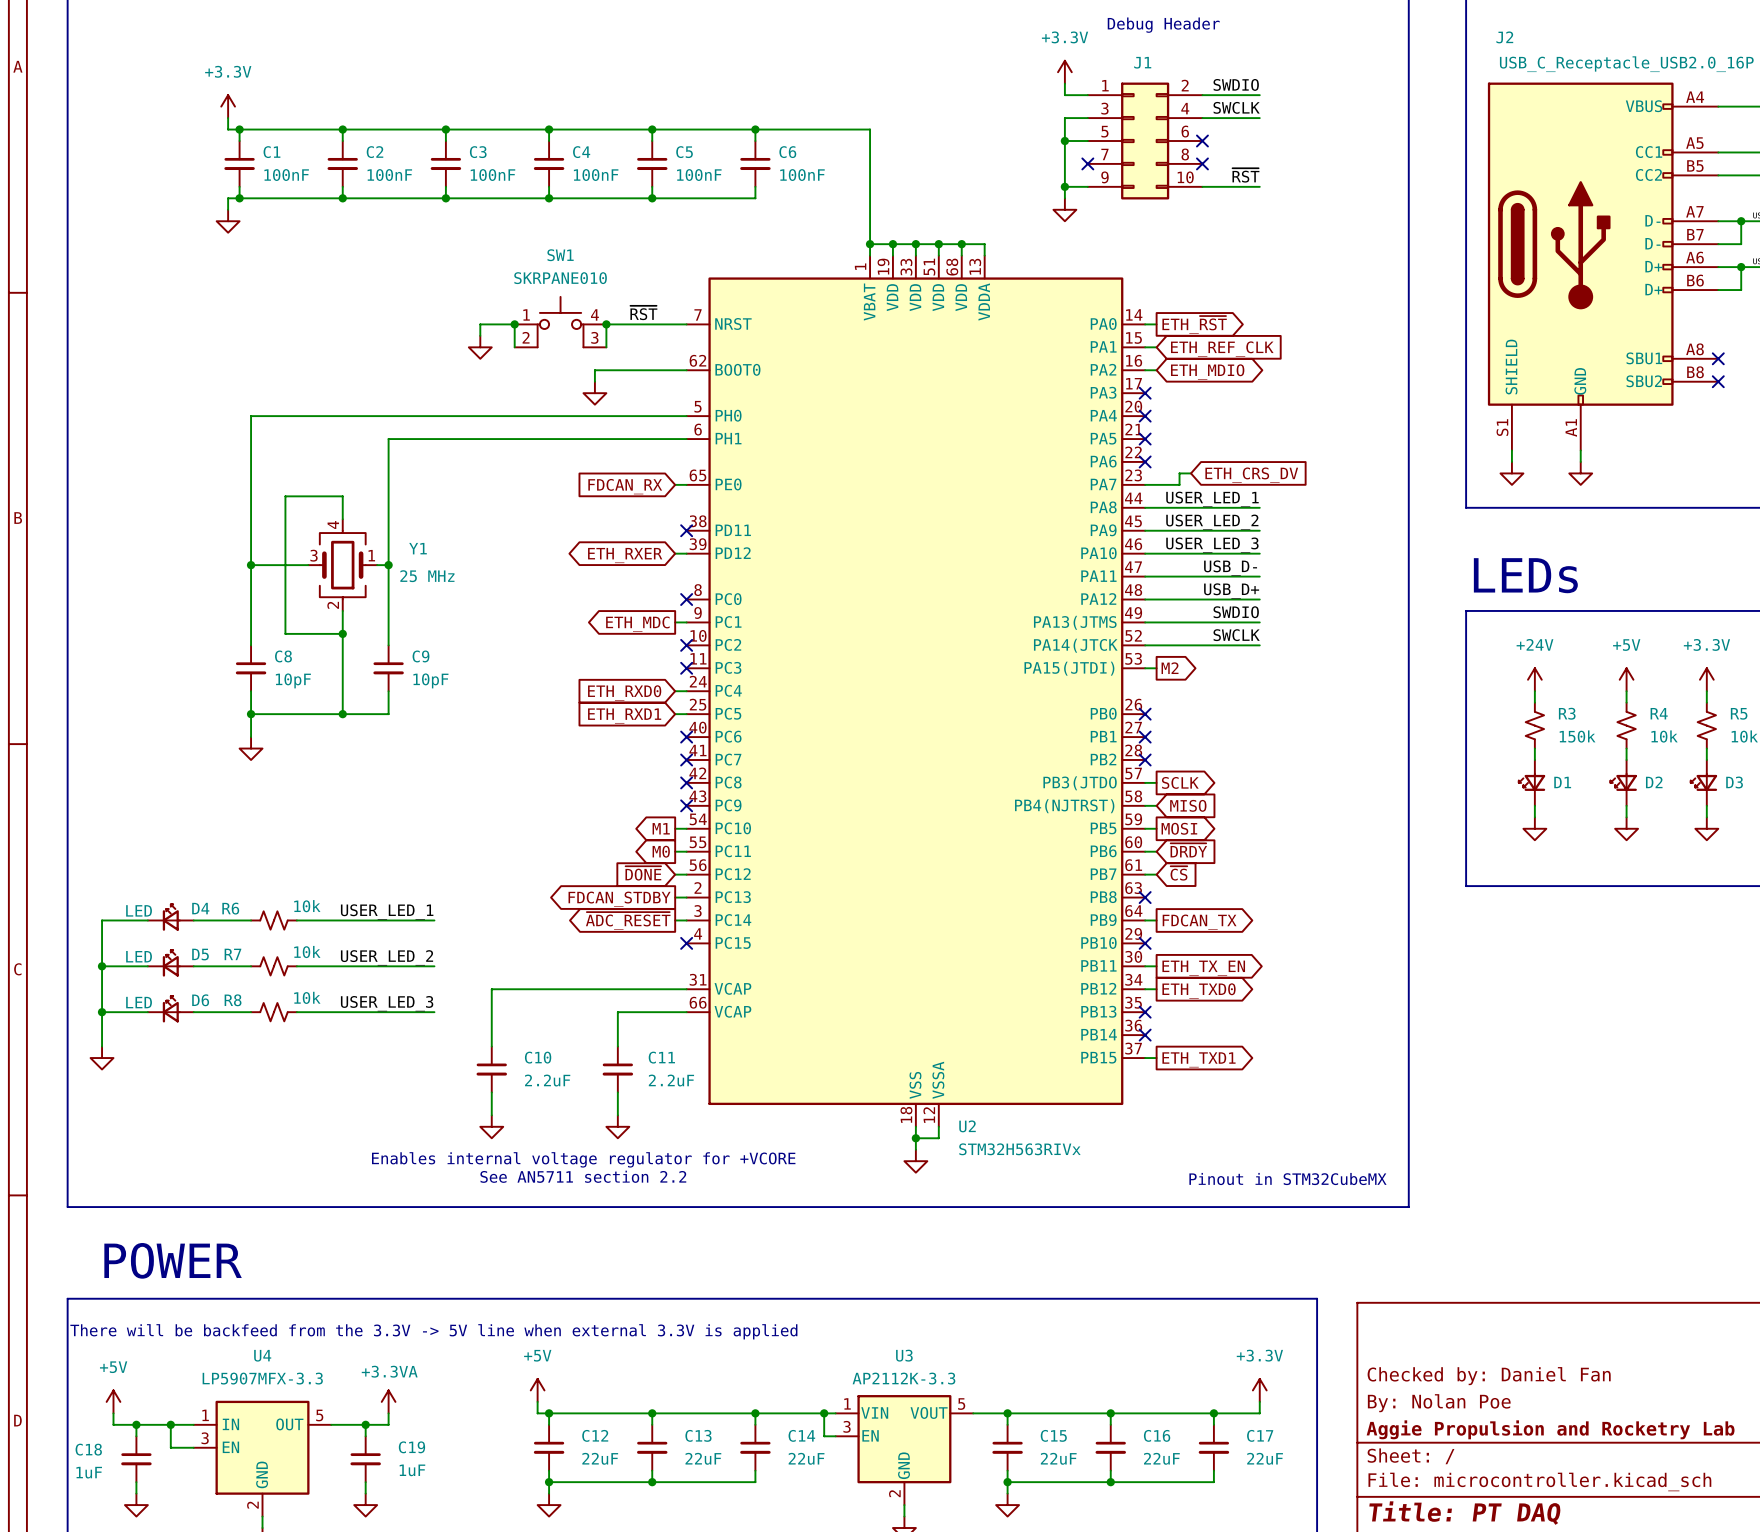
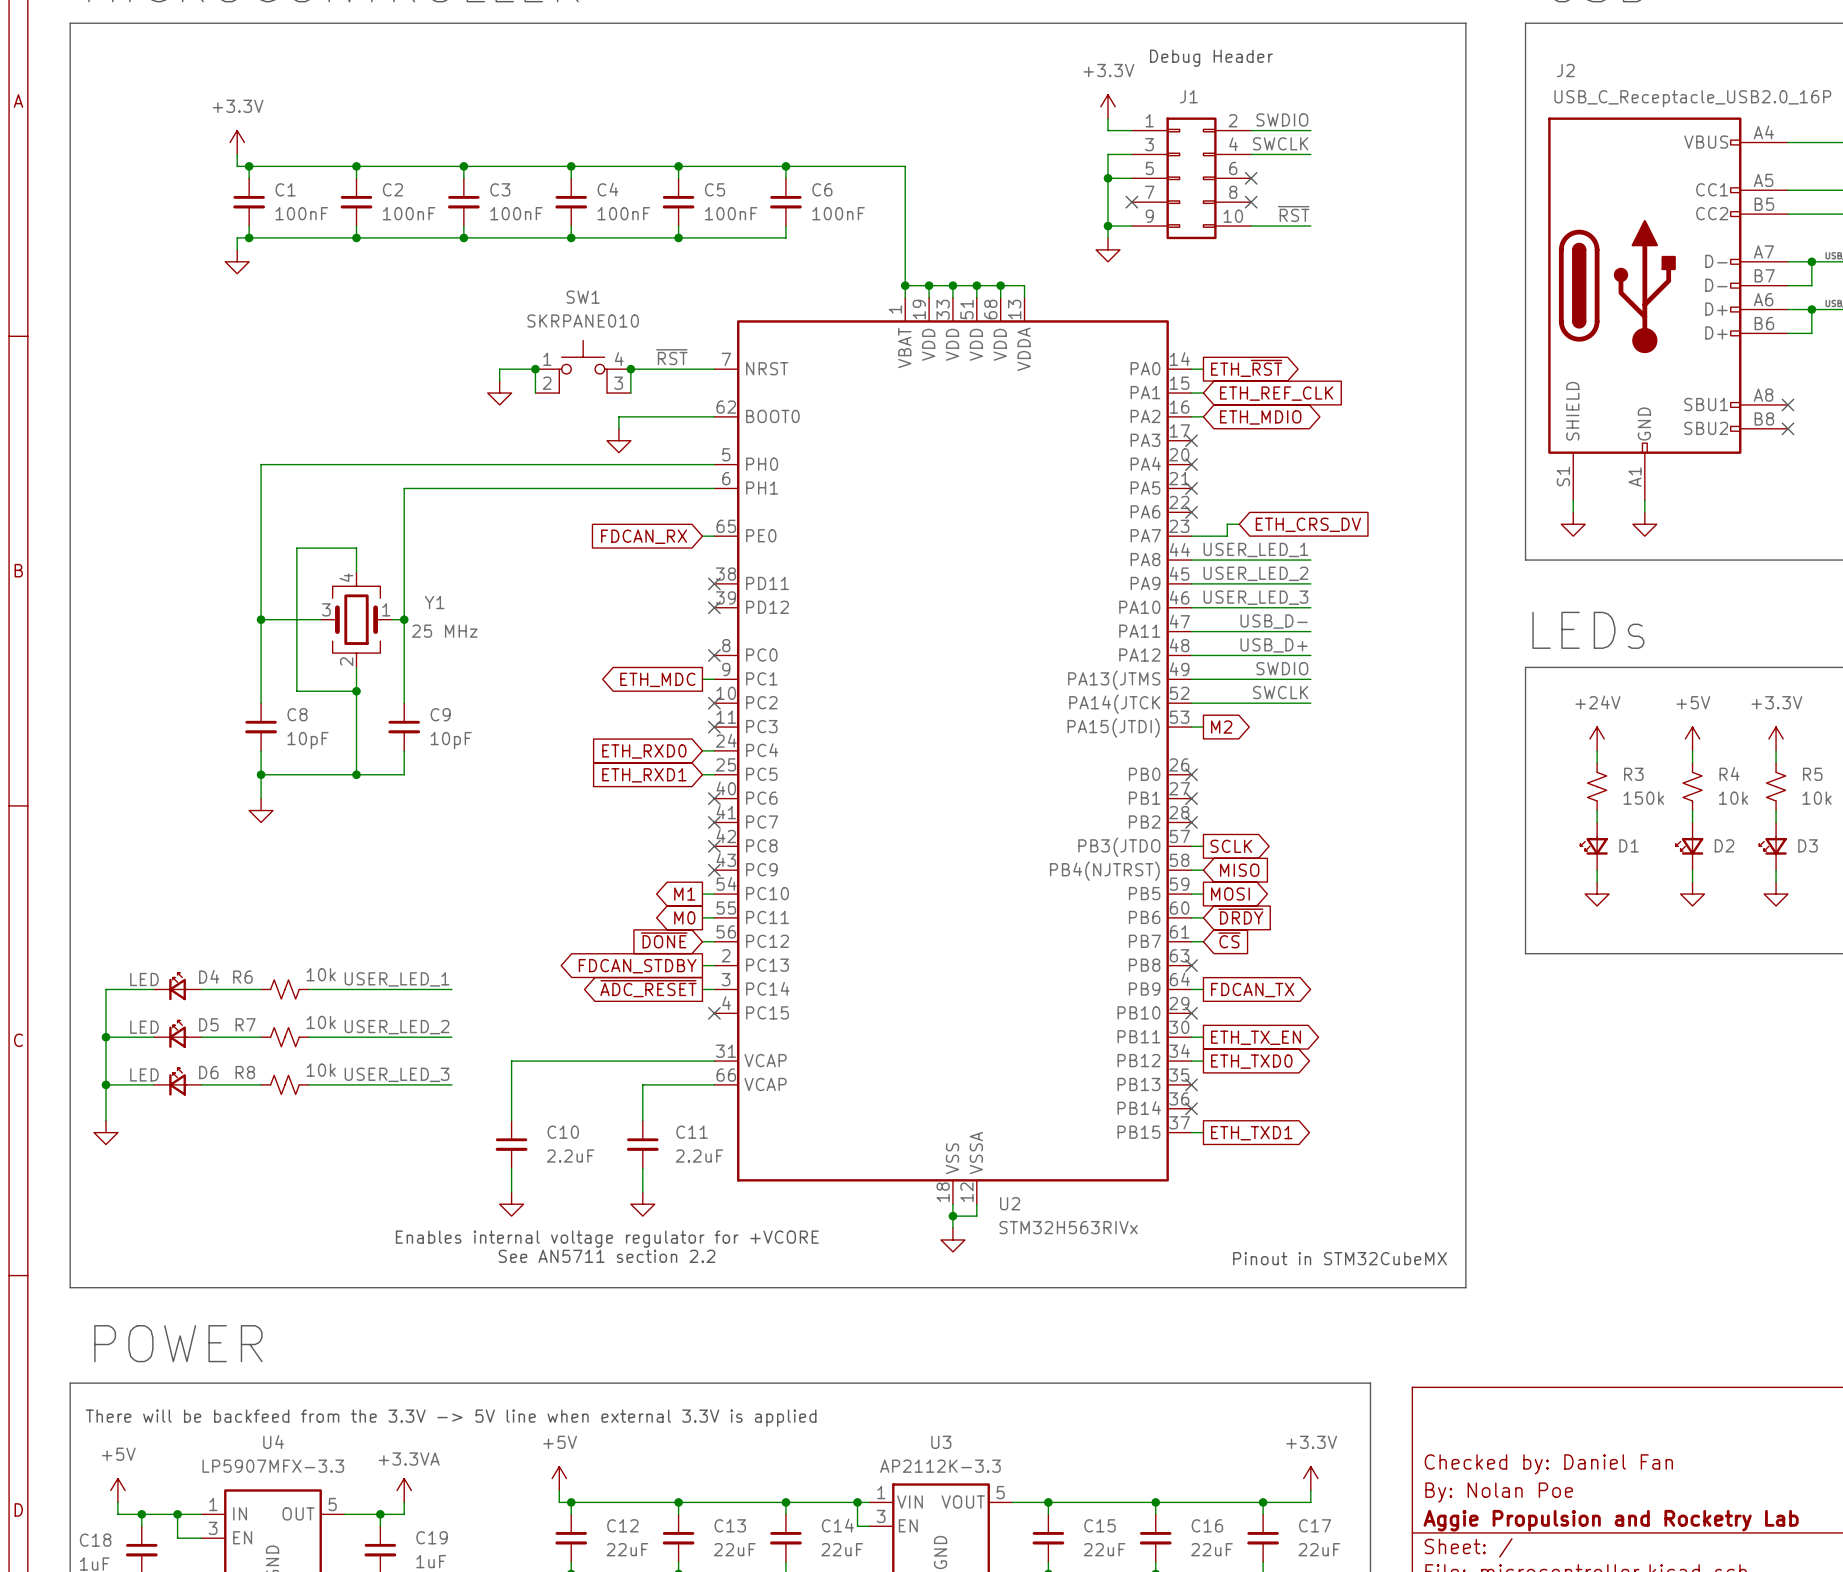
wire: (675, 553) (686, 553) -> none
no-connect mark: none -> (714, 607)
global label: ETH_RXER (625, 555) -> none

